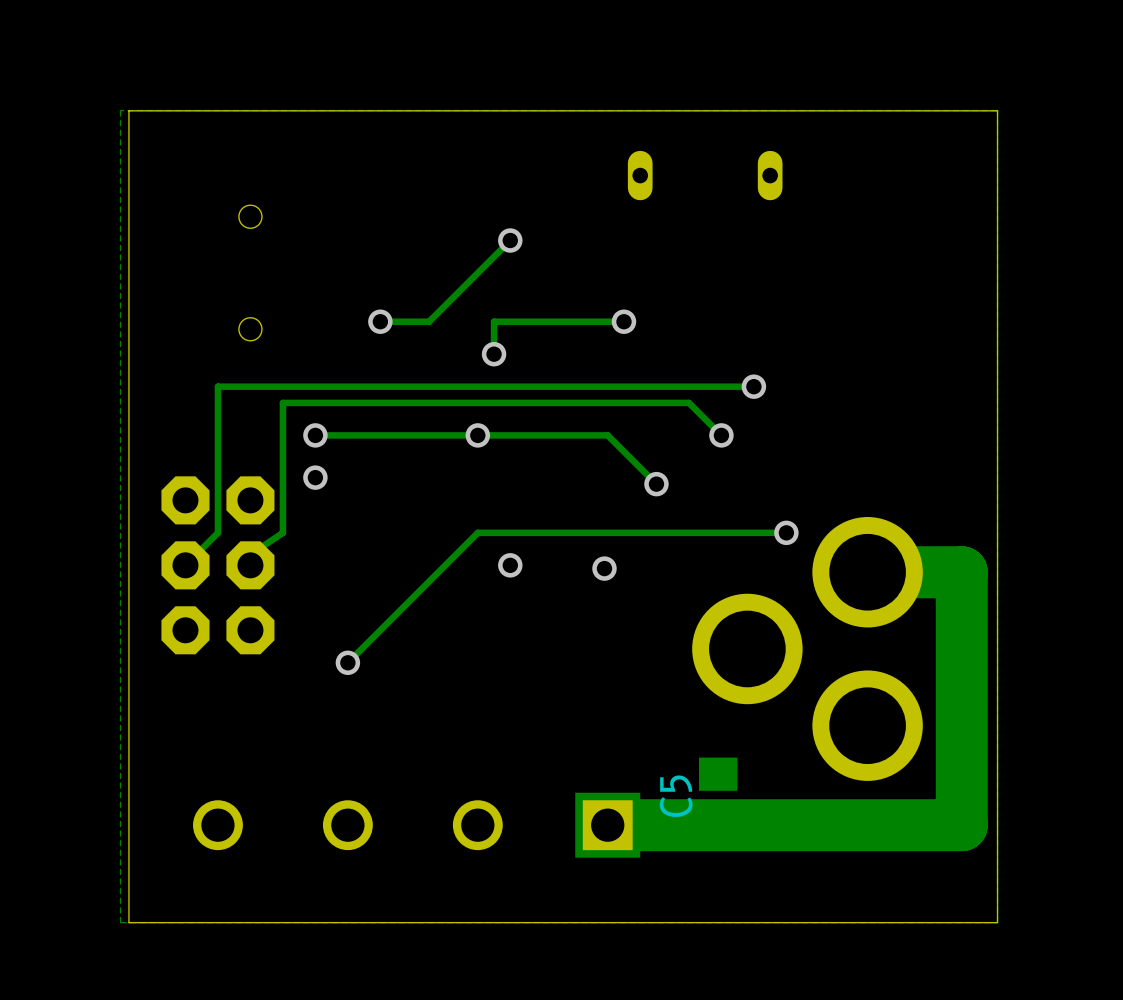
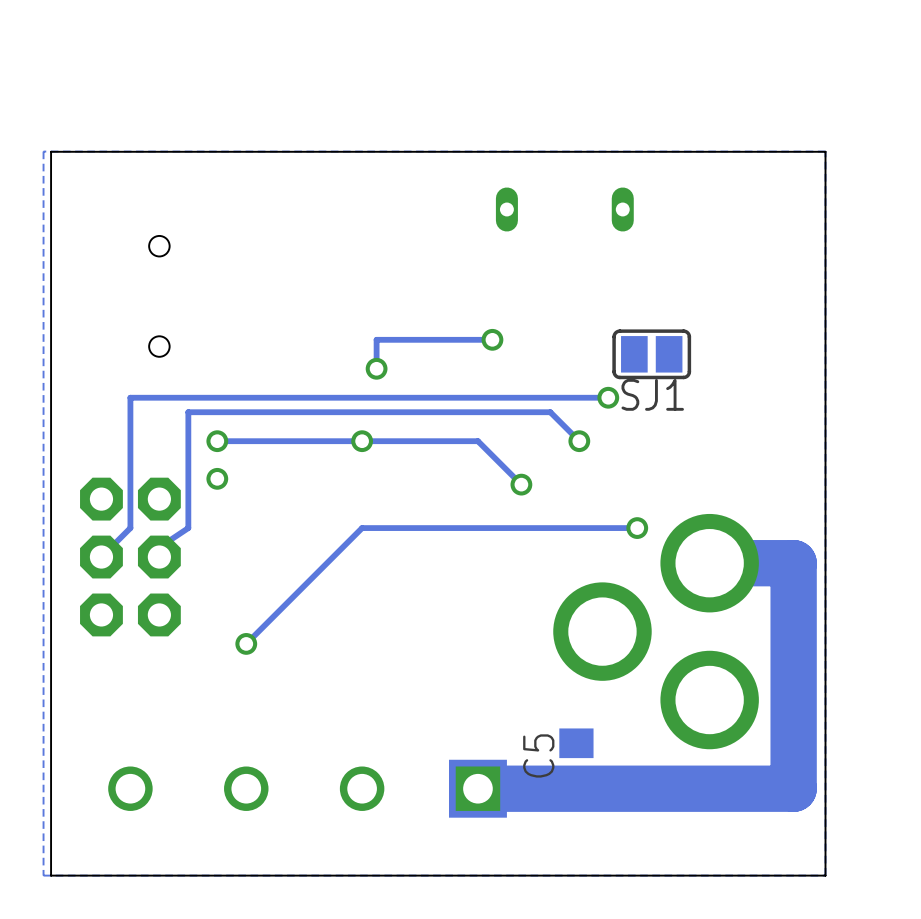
track: (510, 240) (429, 321) (380, 321) -> none
via: (510, 240) -> none
via: (380, 321) -> none
SJ1: none -> (651, 354)
via: (510, 565) -> none
via: (604, 568) -> none

